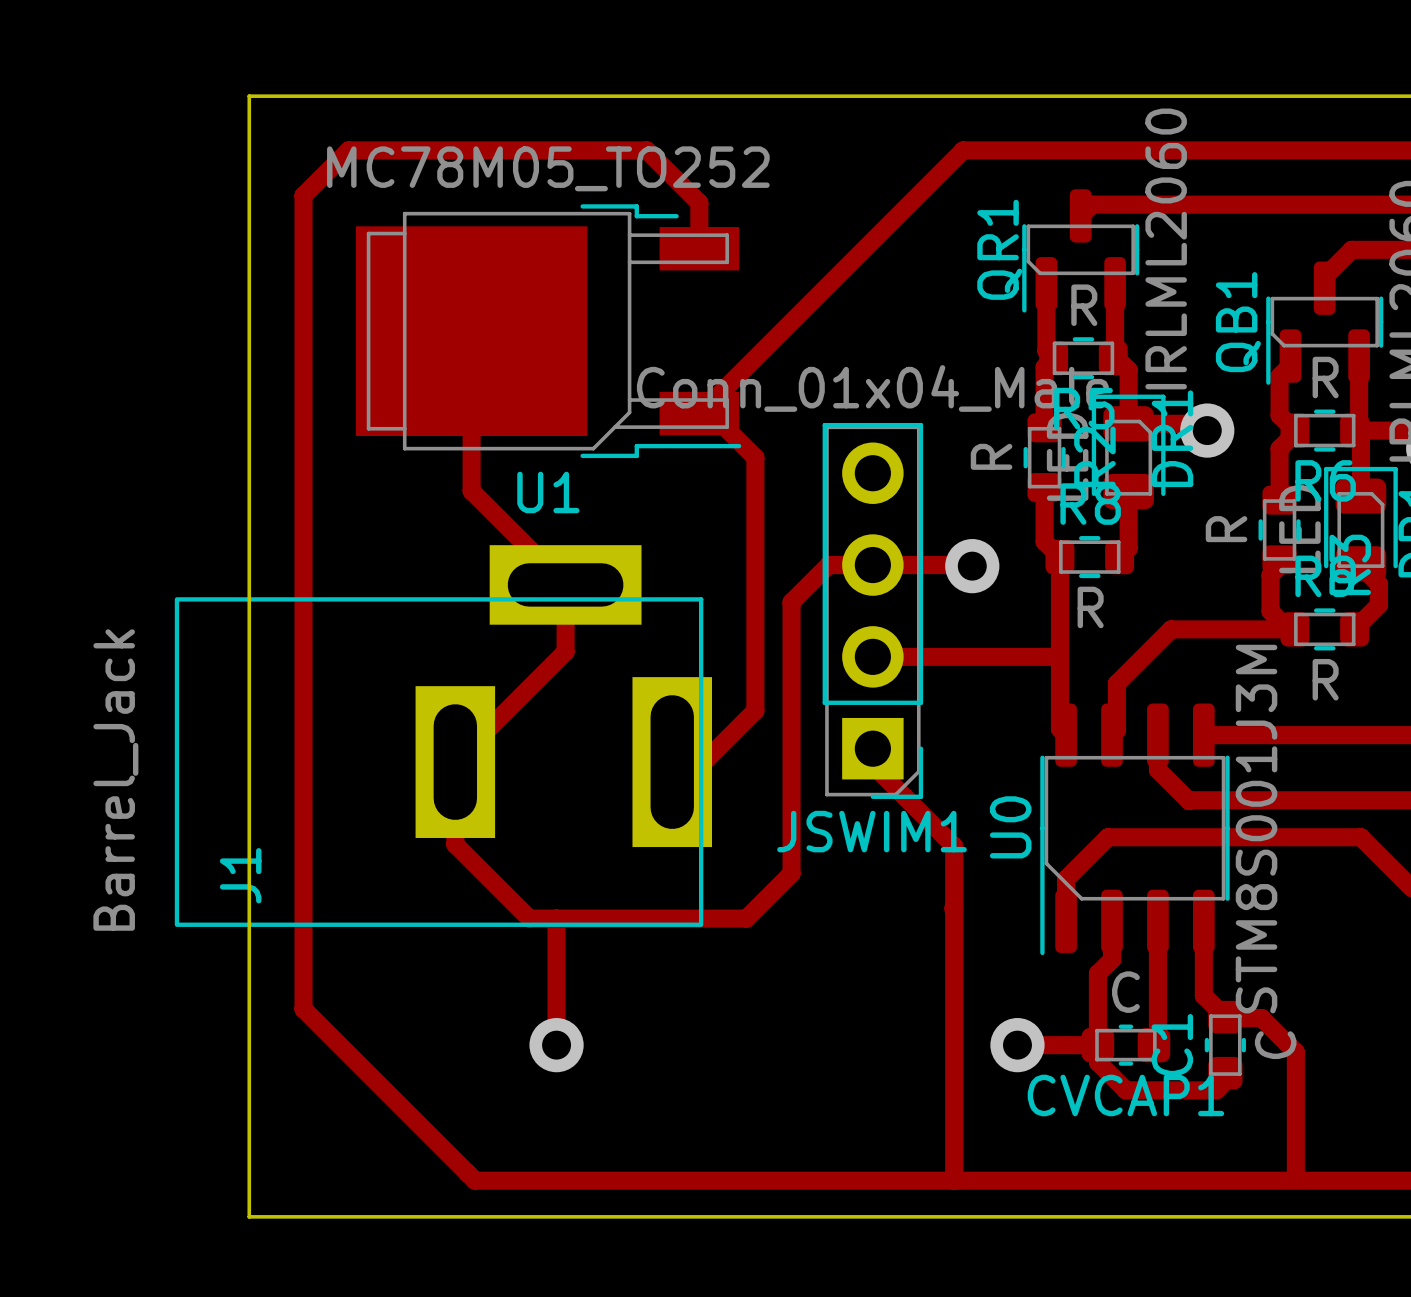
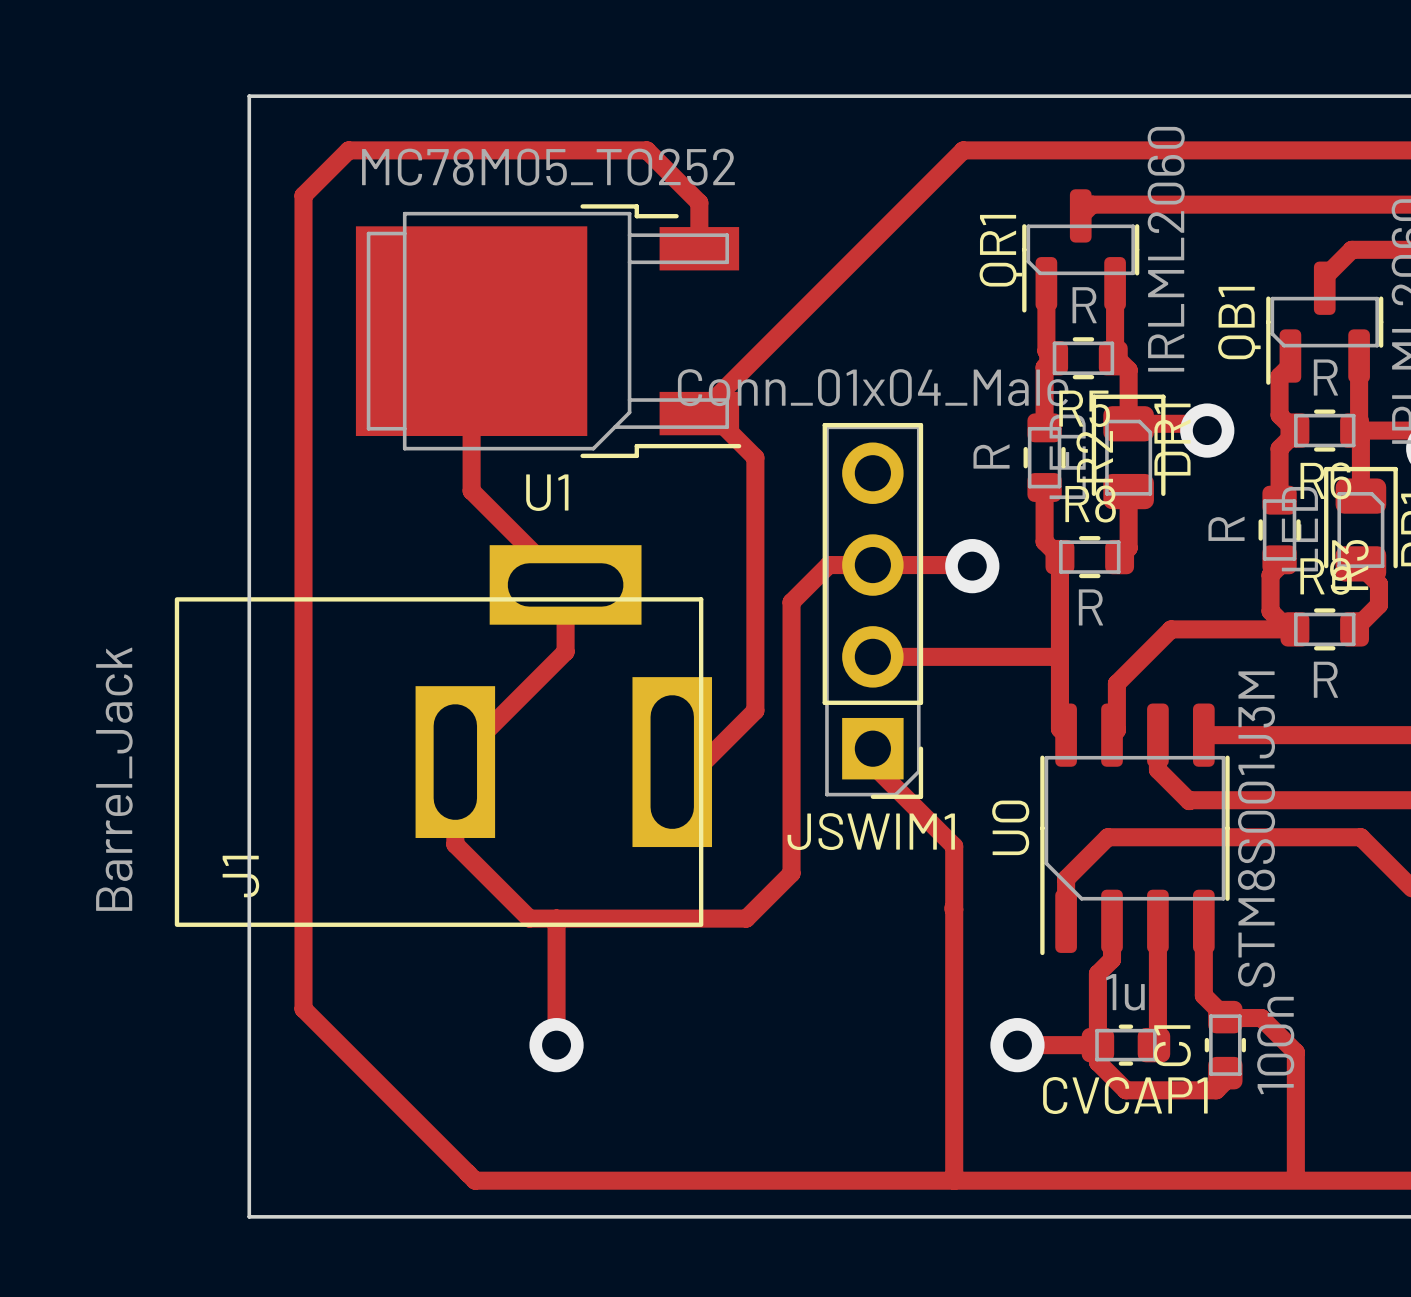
CVCAP1 value: C (1125, 992) -> 1u (1125, 992)
C1 value: C (1275, 1045) -> 100n (1275, 1045)

